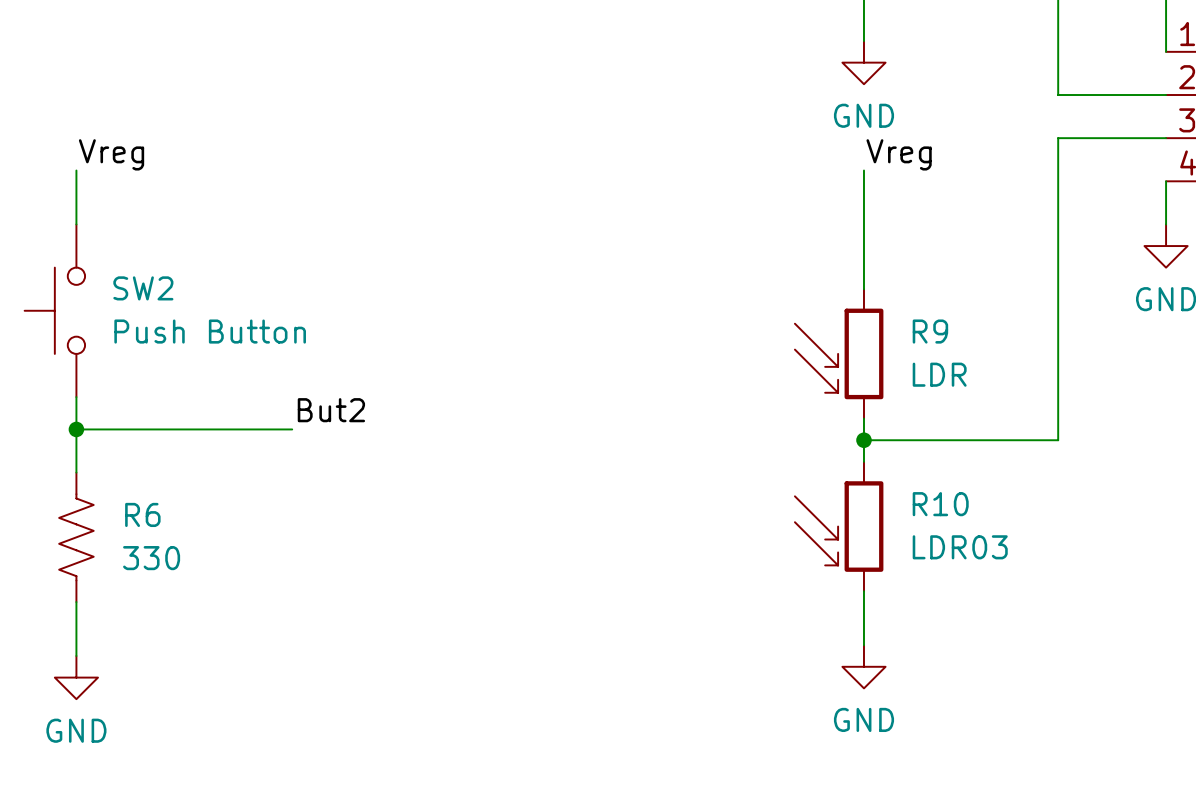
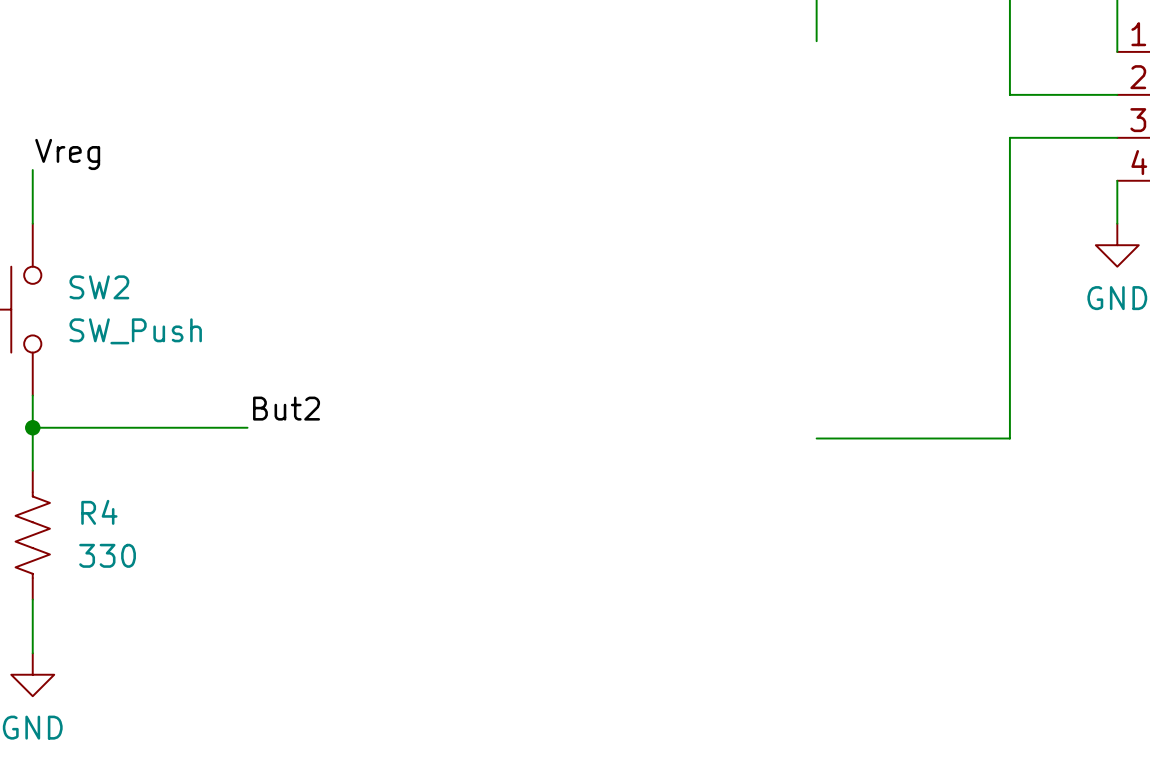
power symbol: GND (863, 62) -> none
label: Vreg (899, 154) -> none
wire: (863, 170) (863, 289) -> none
SW2 value: Push Button (210, 331) -> SW_Push (135, 331)
R9: LDR (839, 353) -> none
wire: (863, 418) (863, 461) -> none
junction: (863, 440) -> none
R6 name: R6 (142, 514) -> R4 (99, 512)
R10: LDR03 (839, 526) -> none
wire: (863, 591) (863, 645) -> none
power symbol: GND (863, 666) -> none

